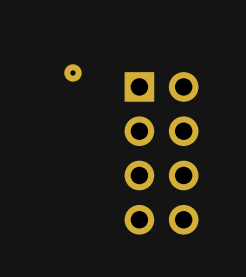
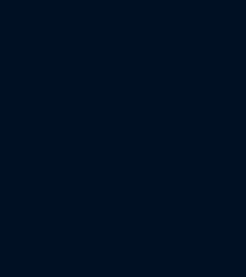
part: (72, 72) -> none
part: (161, 153) -> none

